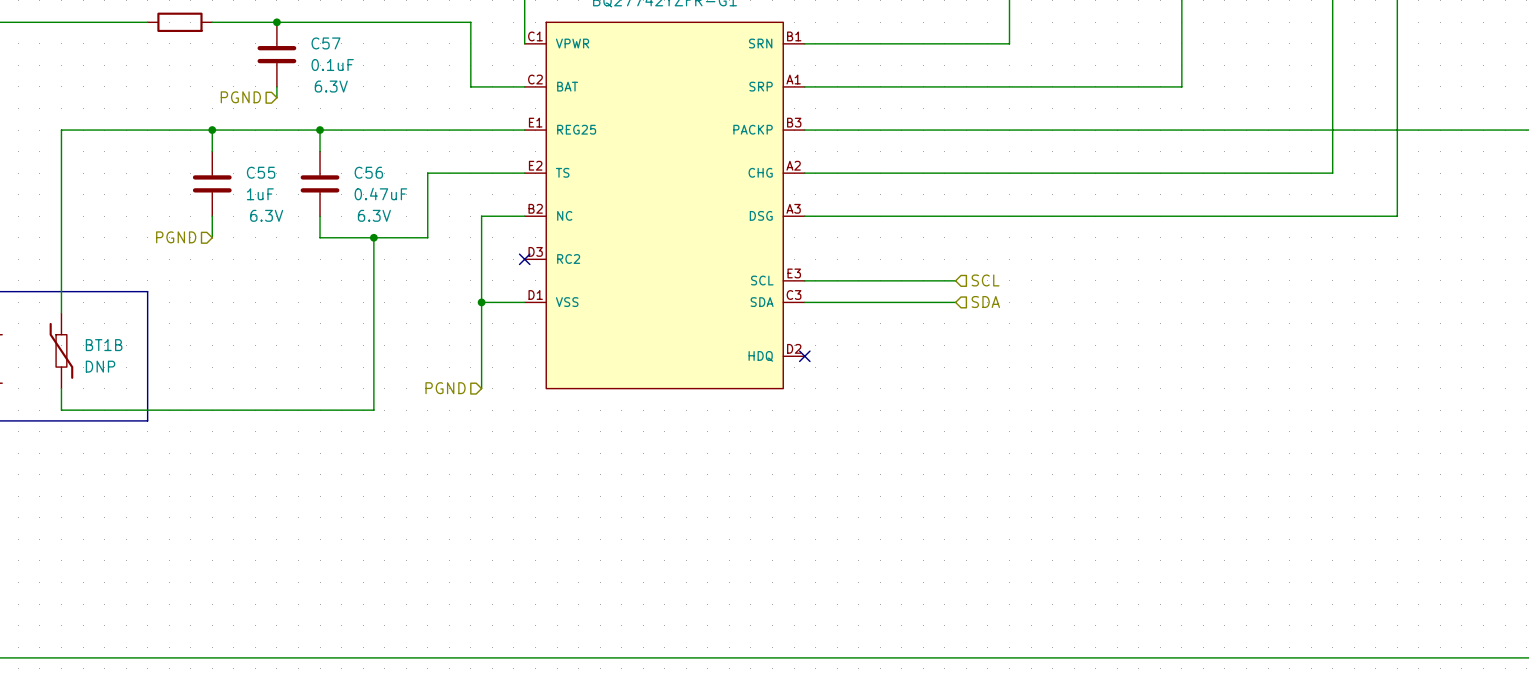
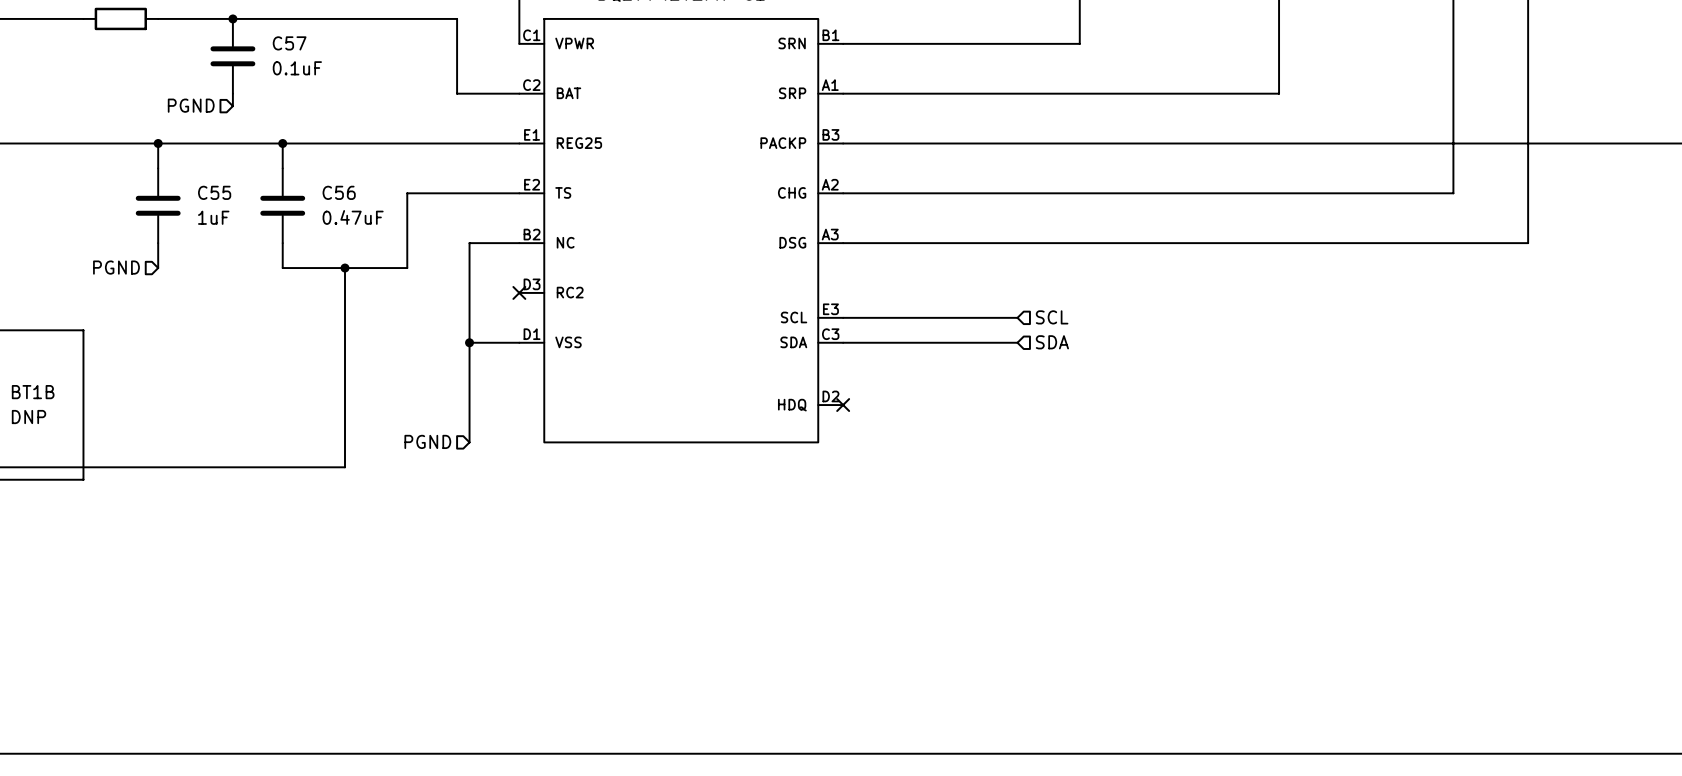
C57 text: 6.3V (331, 86) -> none
C55 text: 6.3V (266, 215) -> none
C56 text: 6.3V (374, 215) -> none

